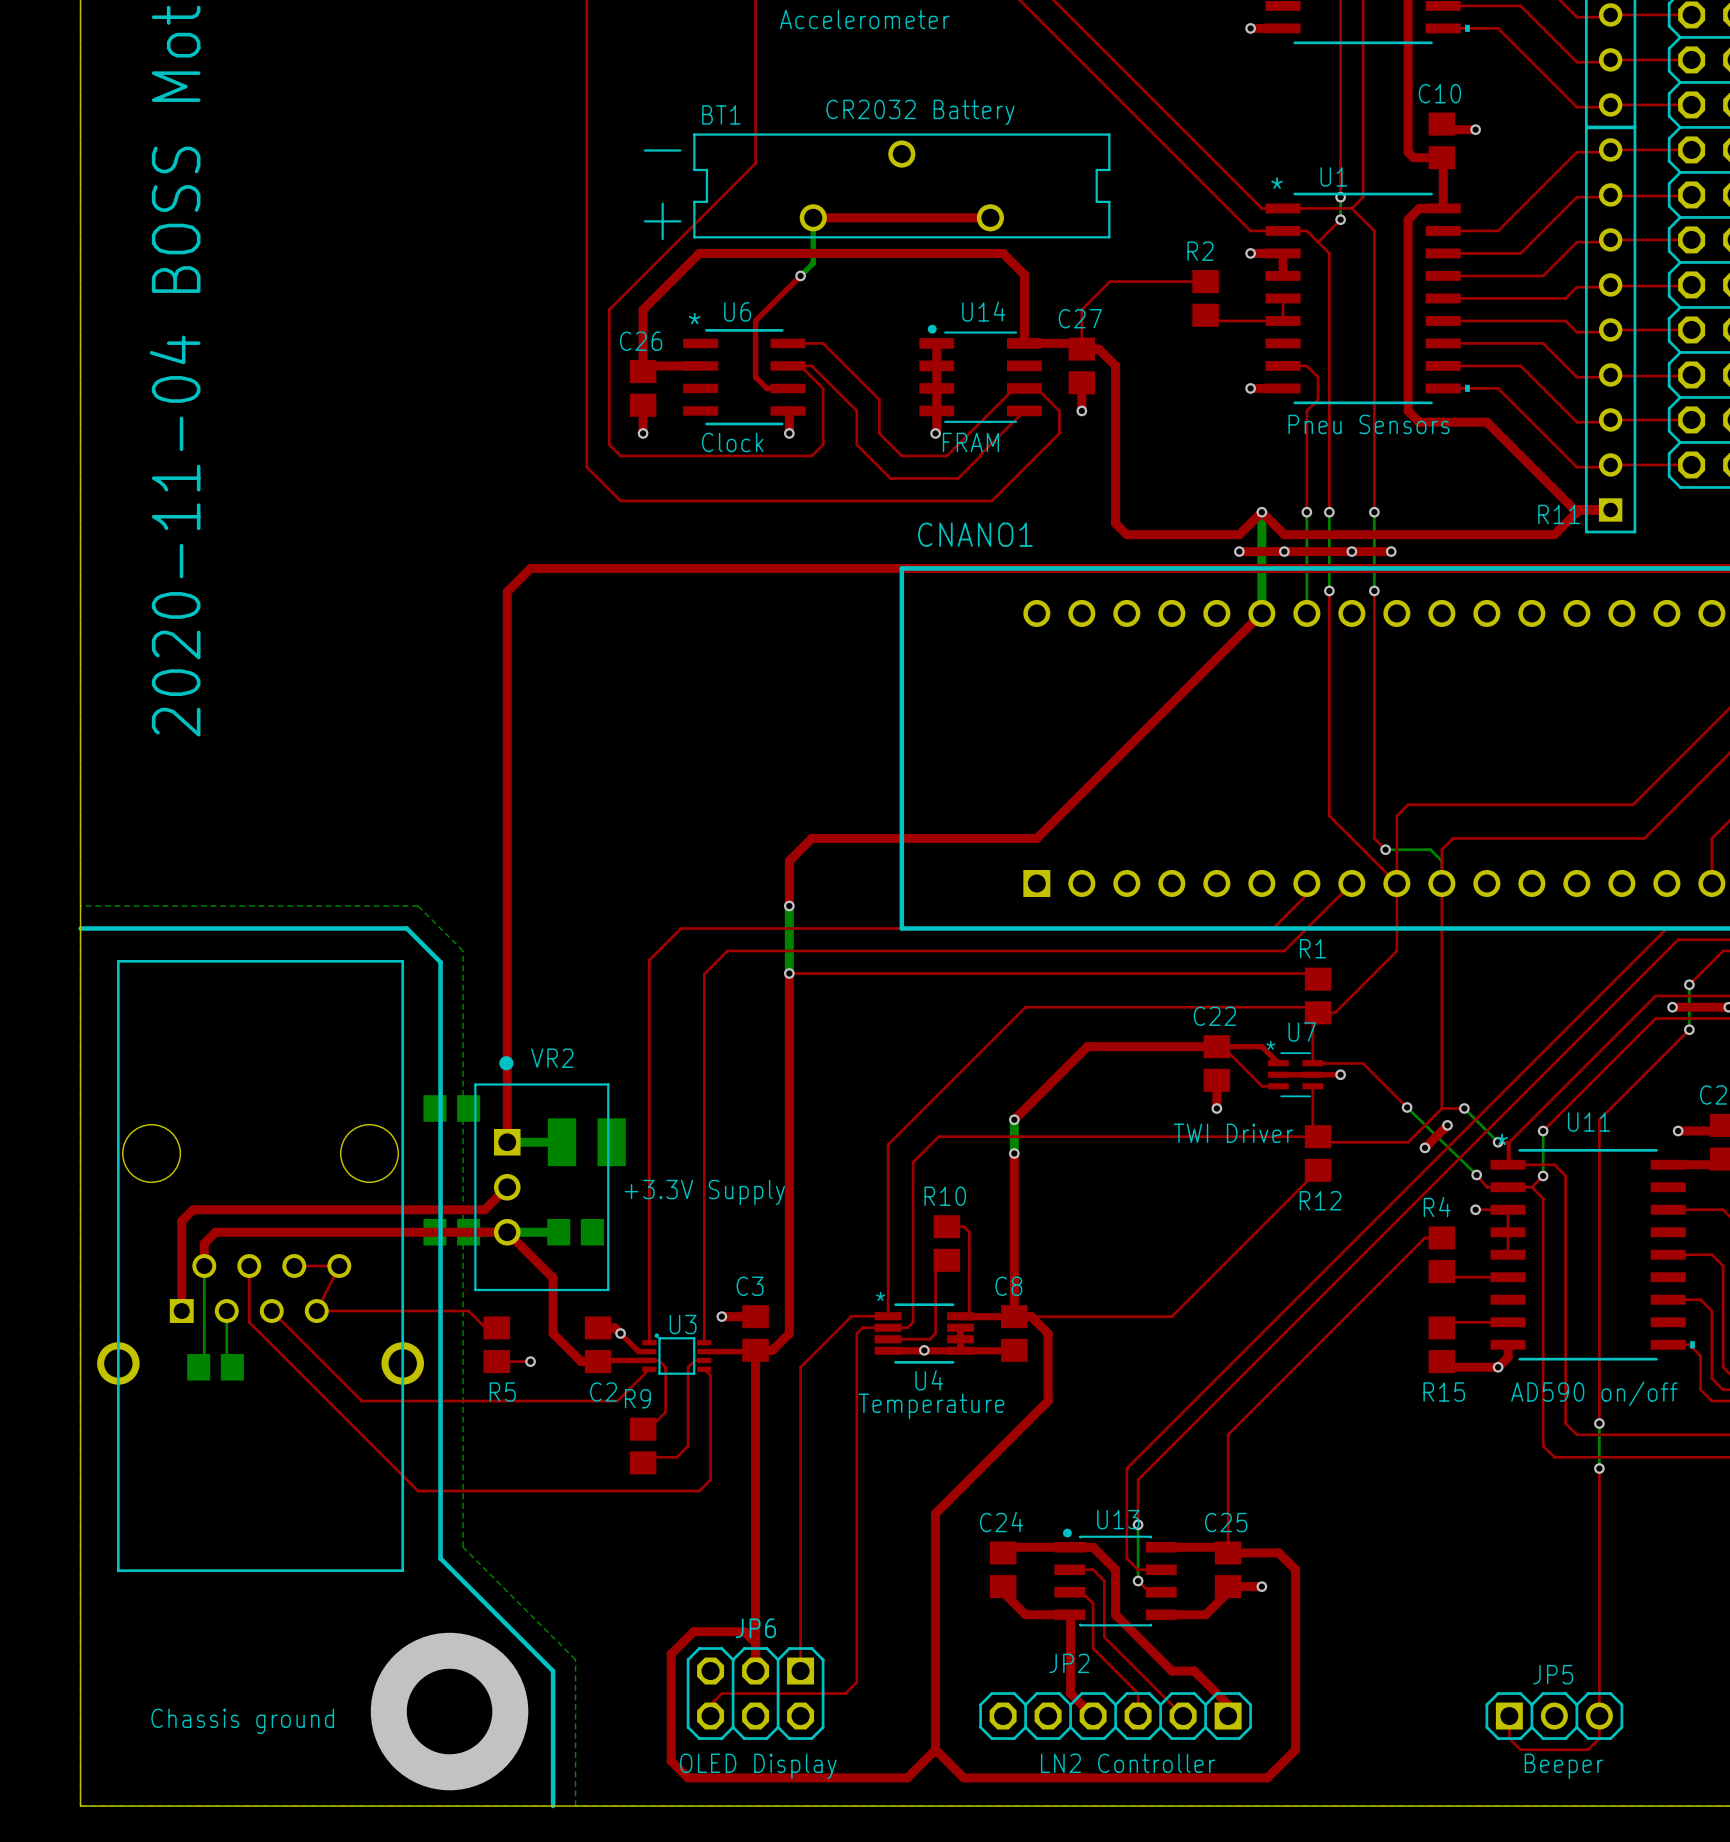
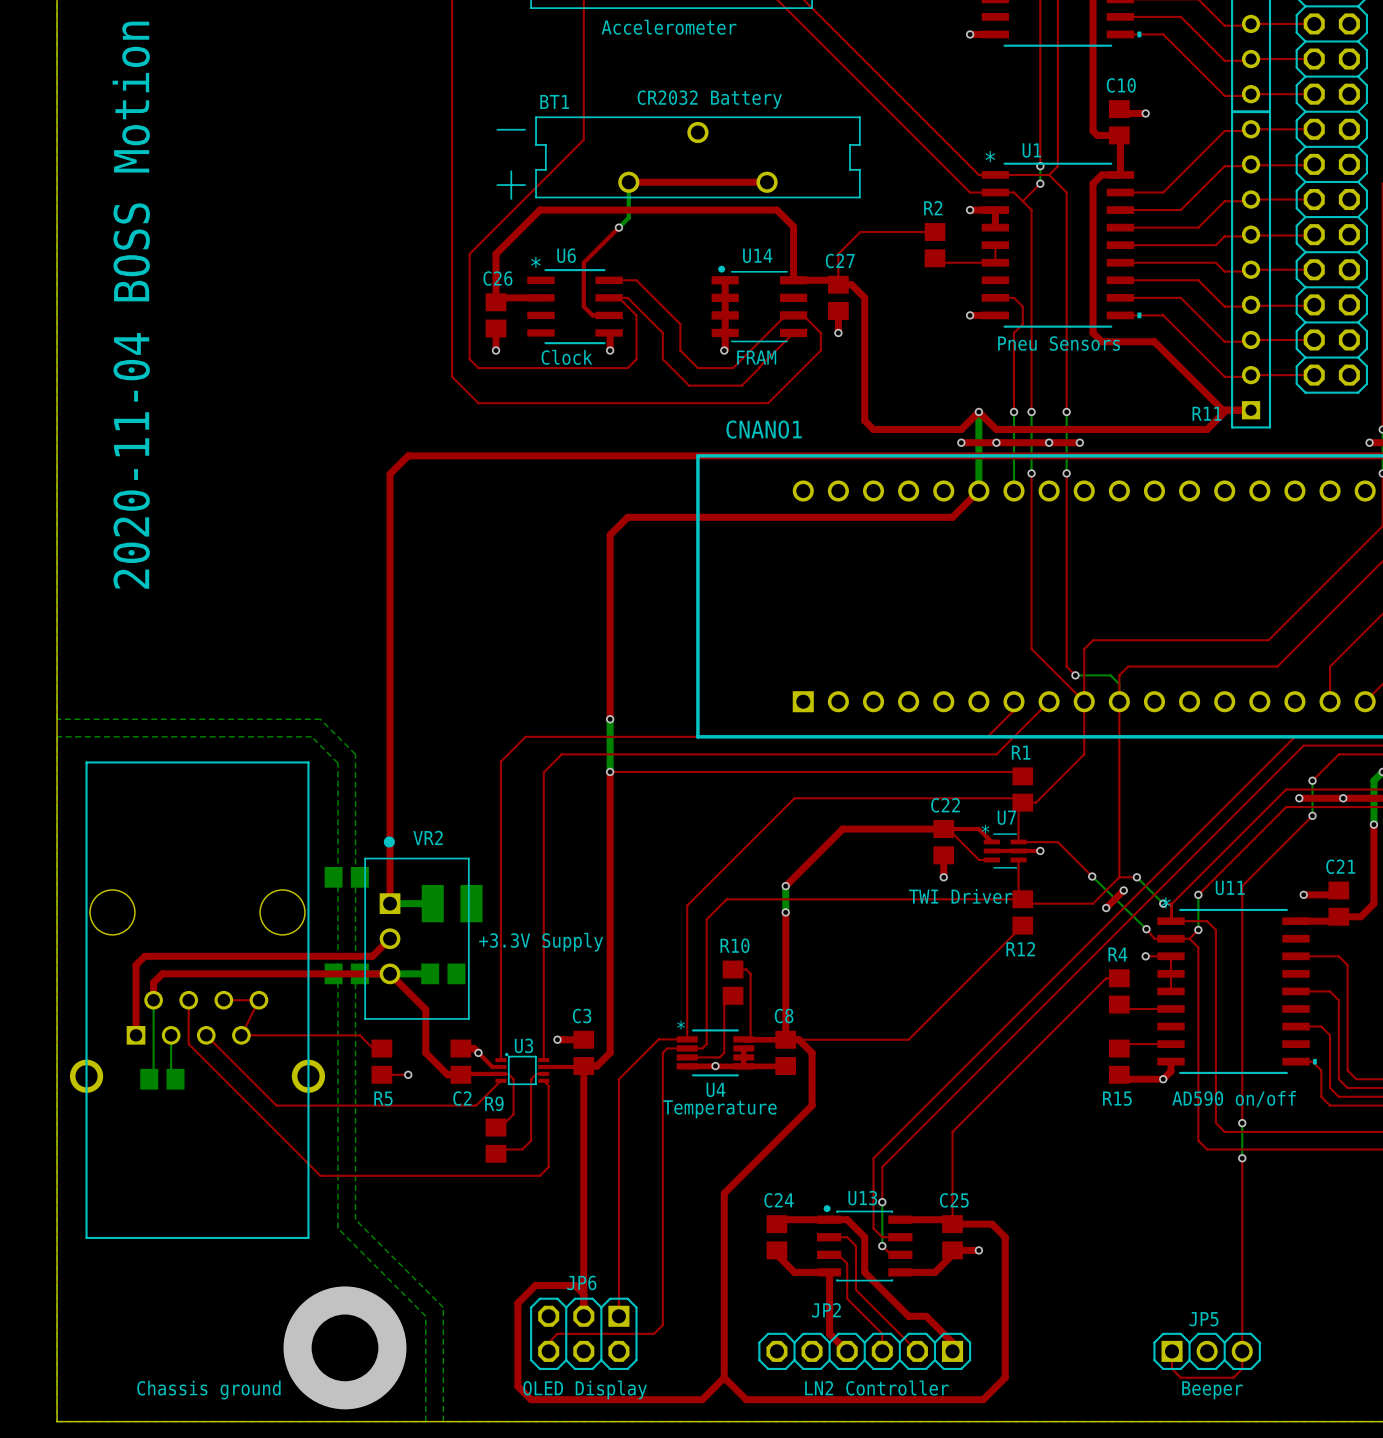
top track: (1228, 647) (1036, 838) (811, 838) (789, 860) -> (952, 517) (627, 517) (610, 534) (610, 684)
line: (80, 928) (406, 928) (440, 962) (440, 1558) (553, 1671) (553, 1806) -> none
text position: Chassis ground (242, 1721) -> Chassis ground (208, 1390)

